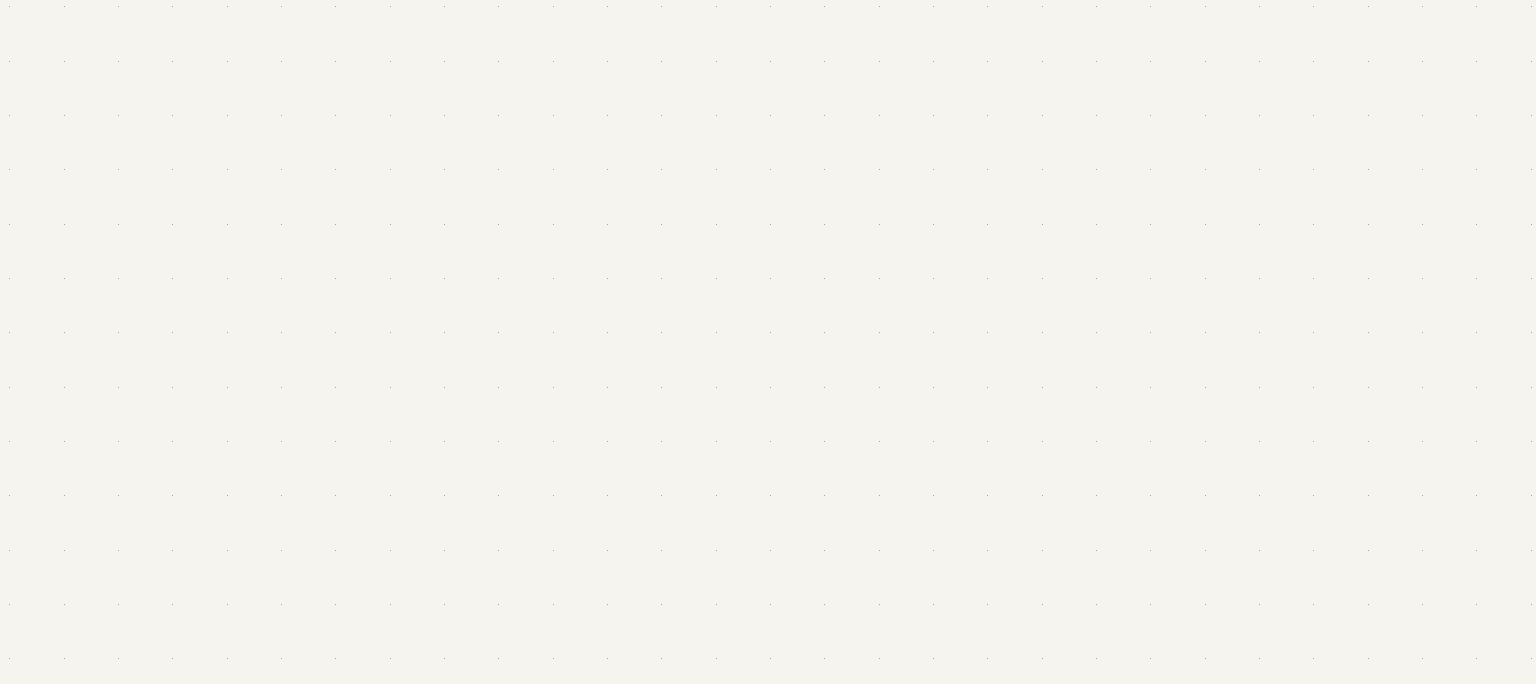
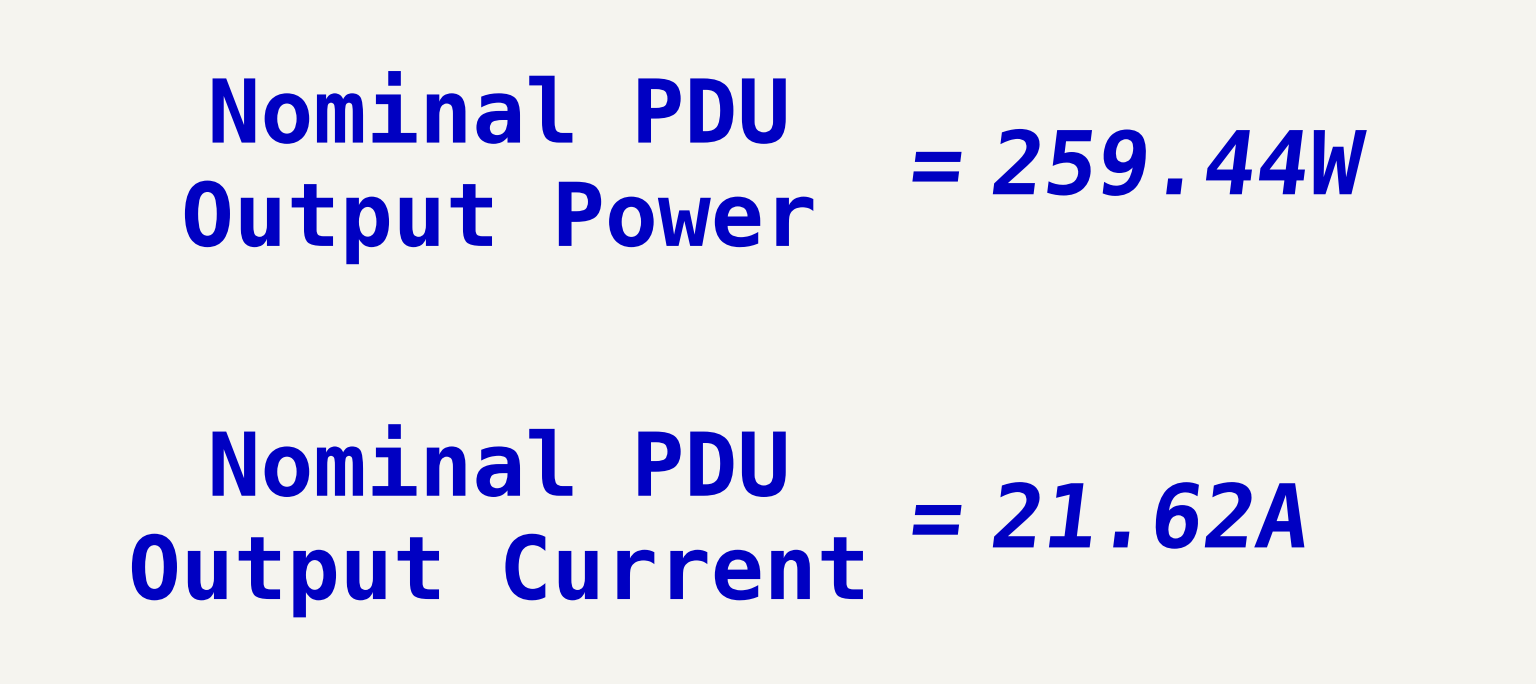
text: none -> Nominal PDU (499, 107)
text: none -> 259.44W (1179, 162)
text: none -> = (936, 166)
text: none -> Output Power (499, 222)
text: none -> Nominal PDU (499, 460)
text: none -> 21.62A (1148, 515)
text: none -> = (936, 519)
text: none -> Output Current (497, 575)

